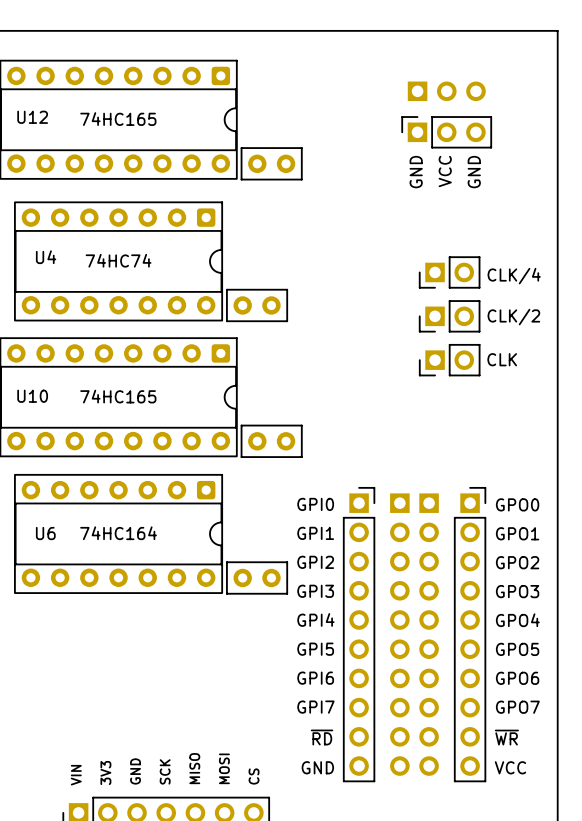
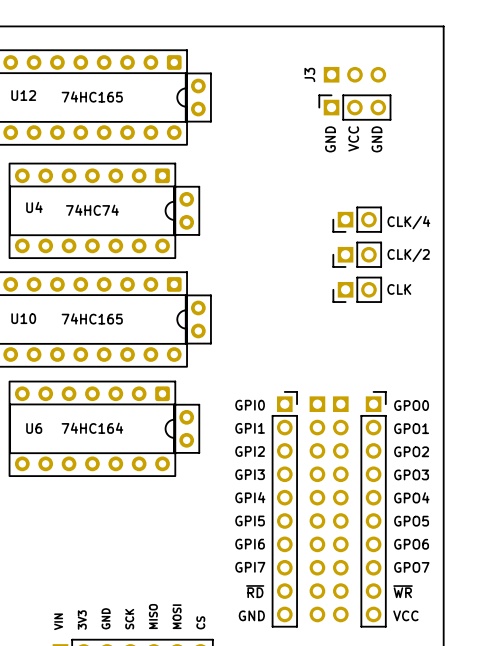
J3 name: none -> J3 (309, 74)
part rotation: 0° (271, 163) -> 90° clockwise (198, 97)
part position: (271, 163) -> (198, 97)
part: none -> (186, 210)
part: (257, 305) -> none
part: none -> (198, 319)
part: (271, 441) -> none
part rotation: 0° (257, 577) -> 90° clockwise (186, 428)
part position: (257, 577) -> (186, 428)

